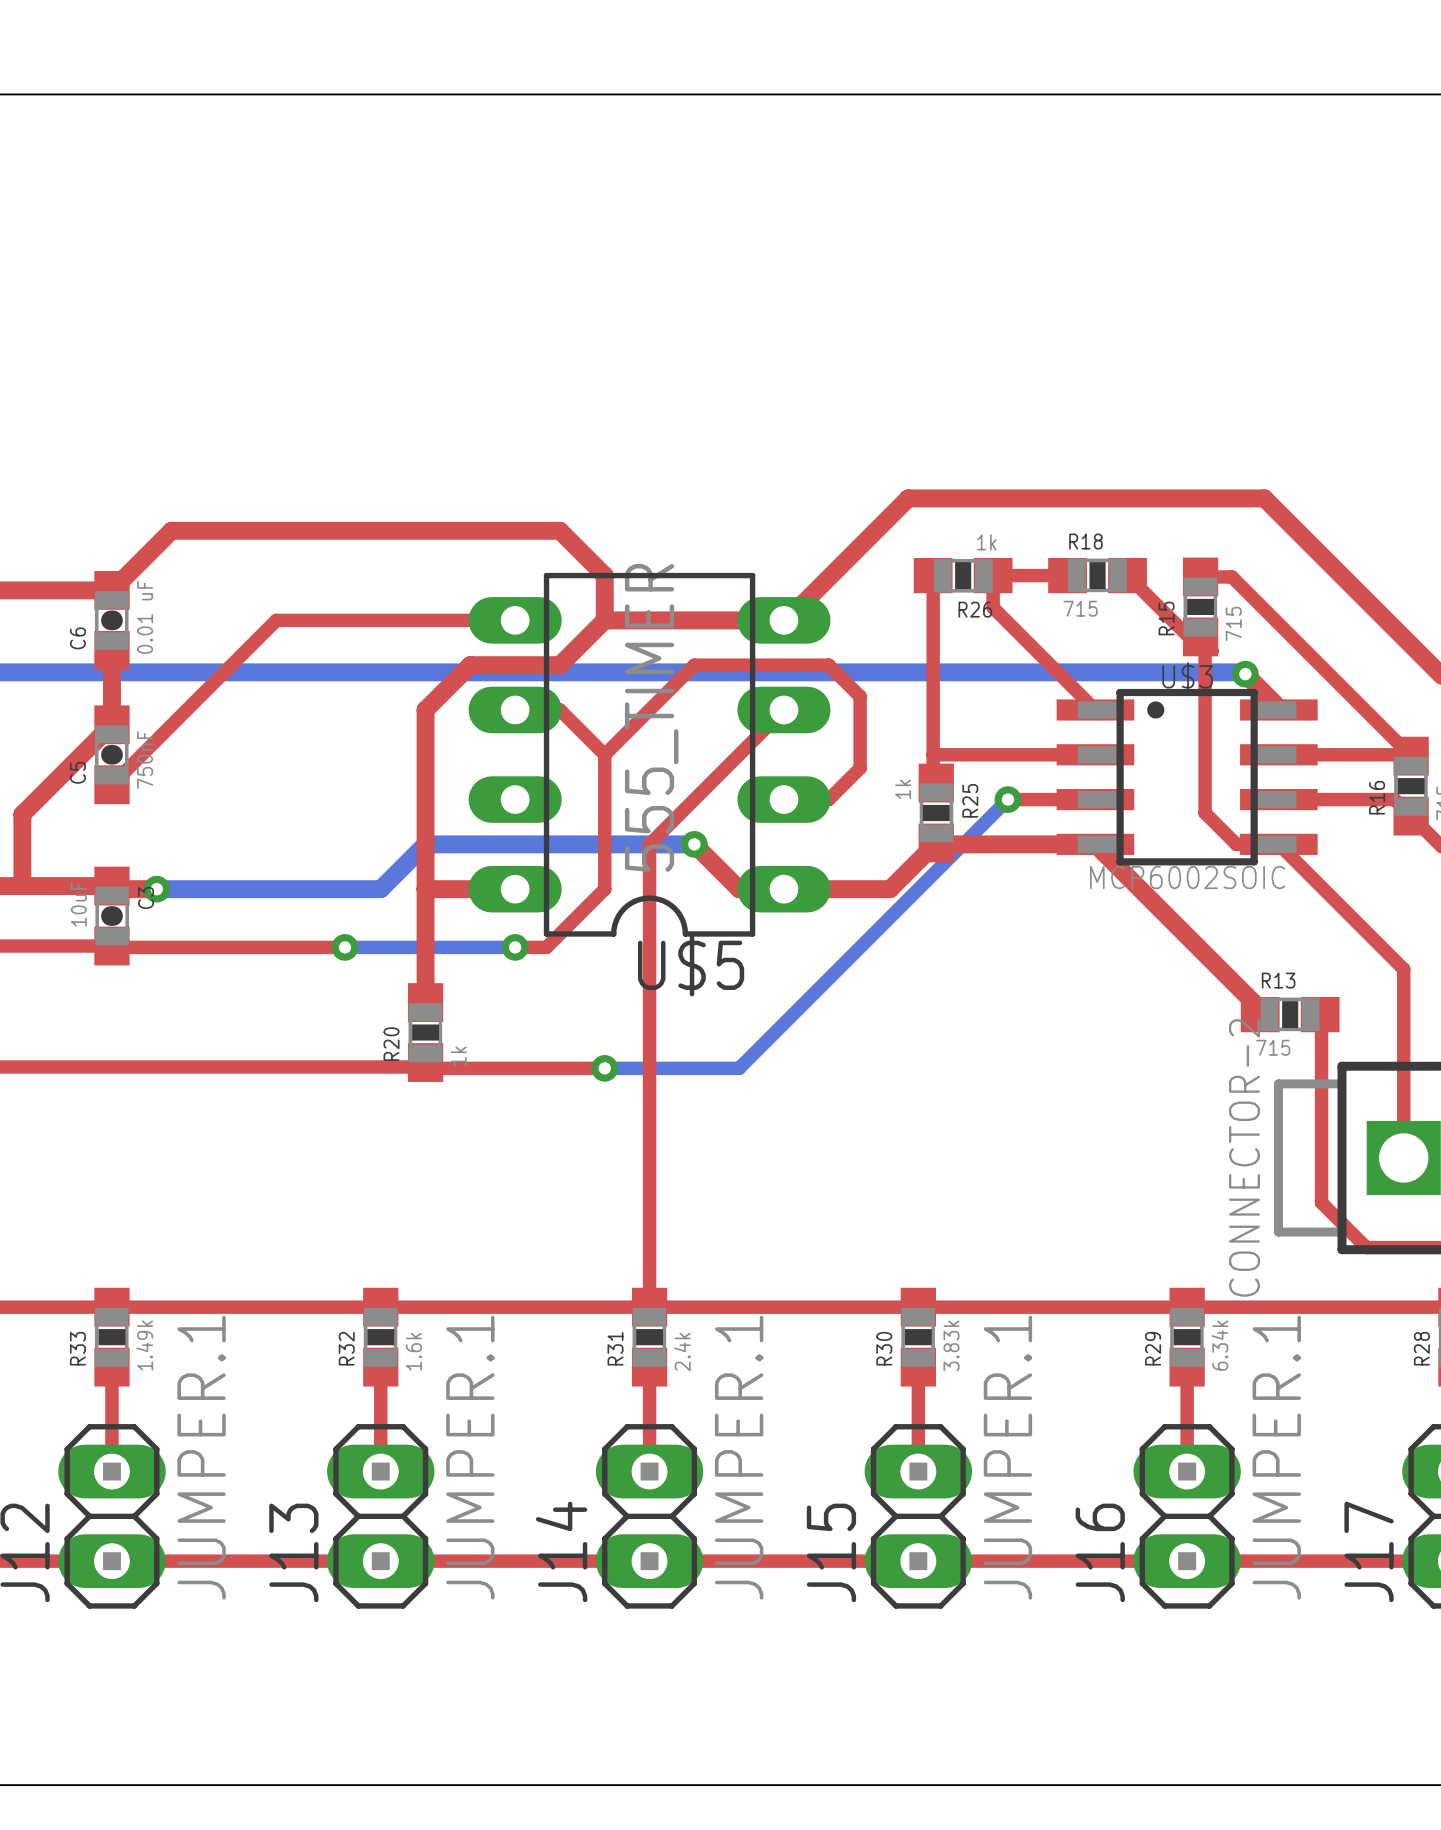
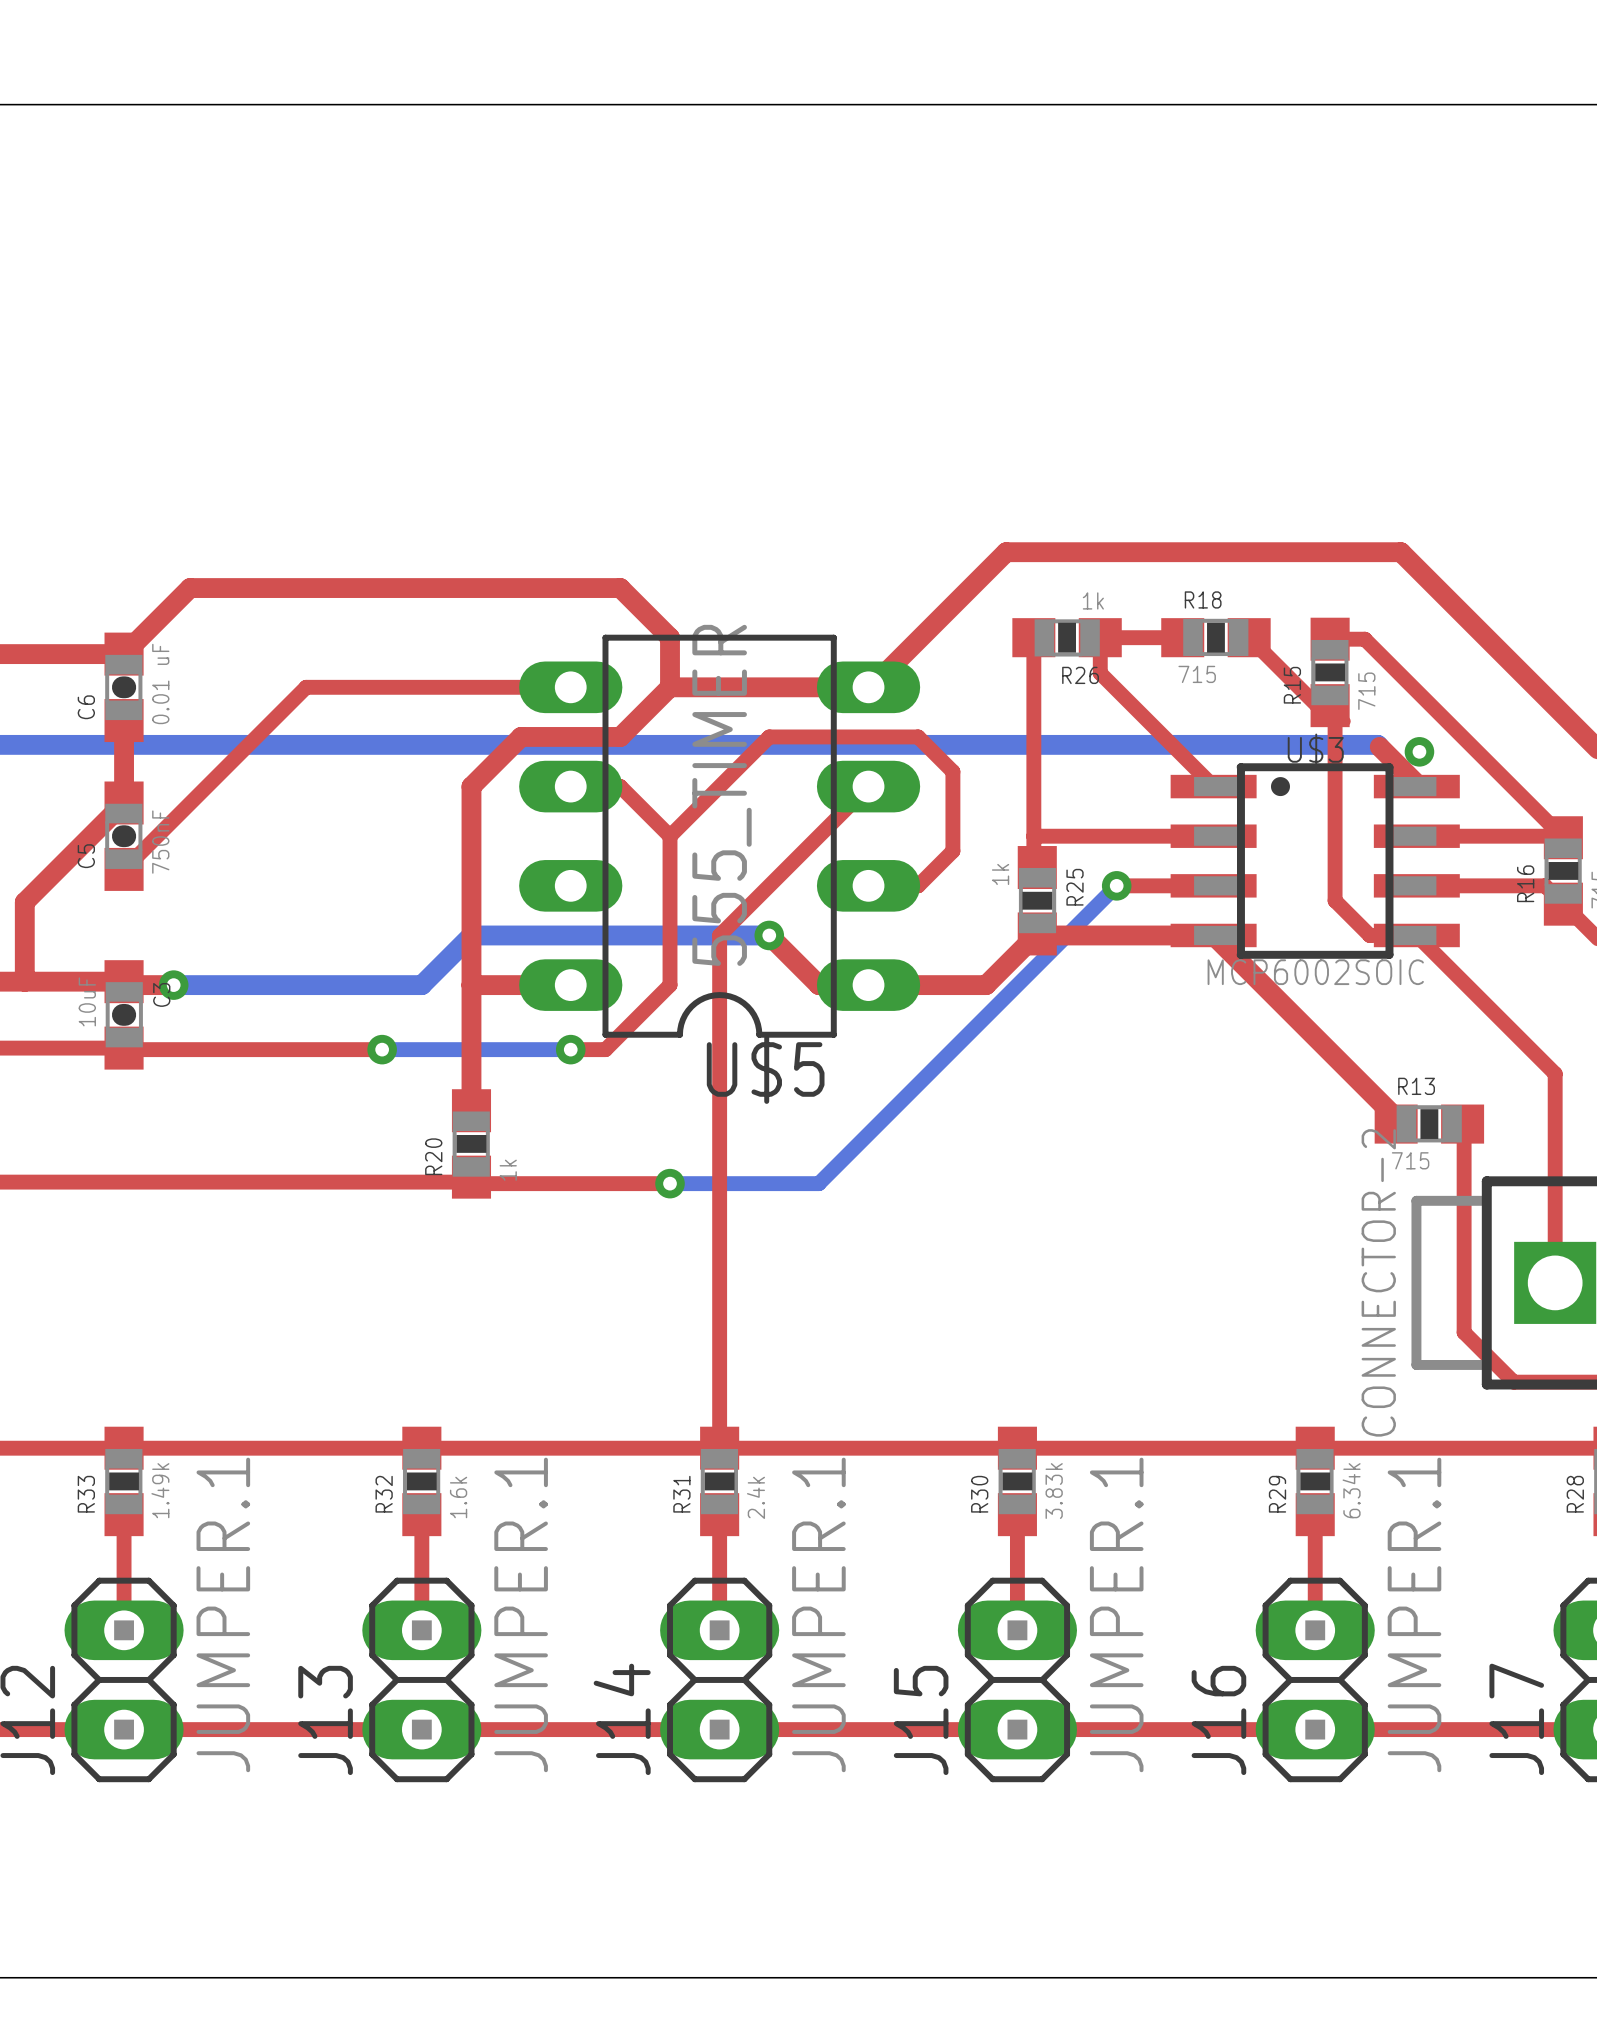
via position: (1245, 674) -> (1419, 751)

